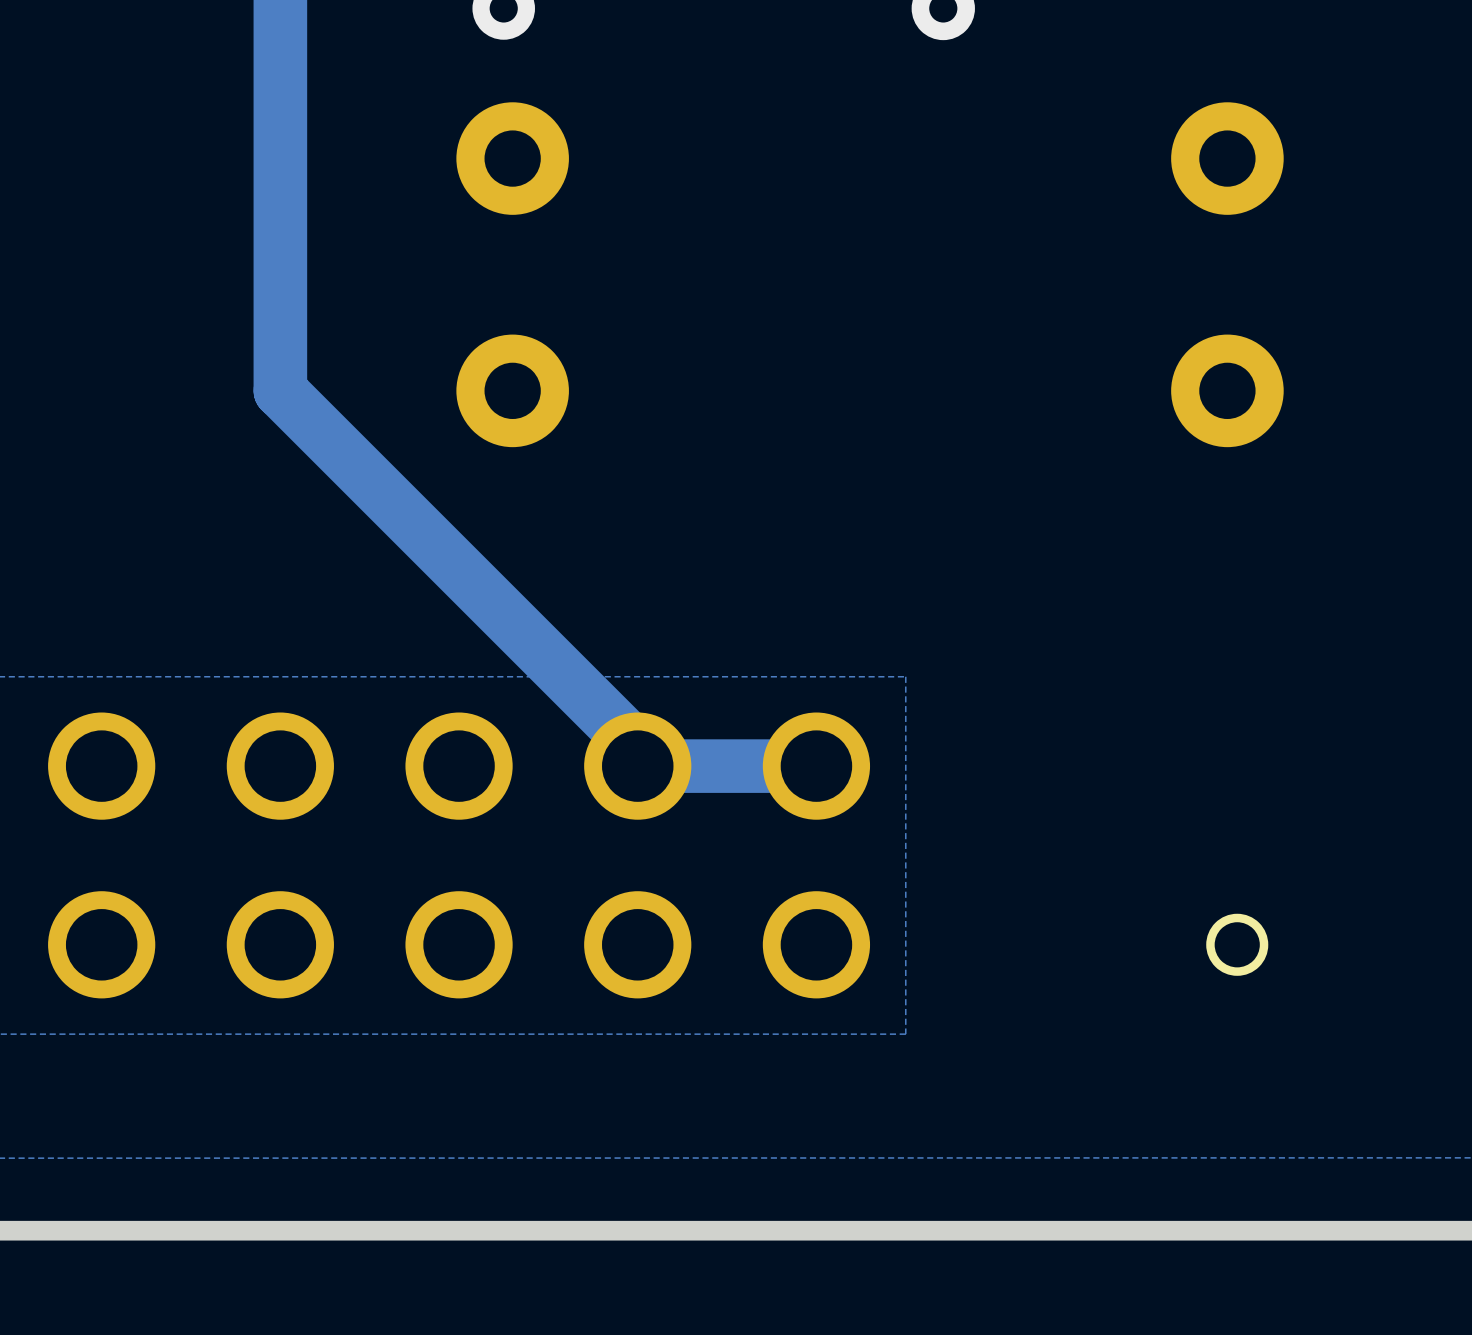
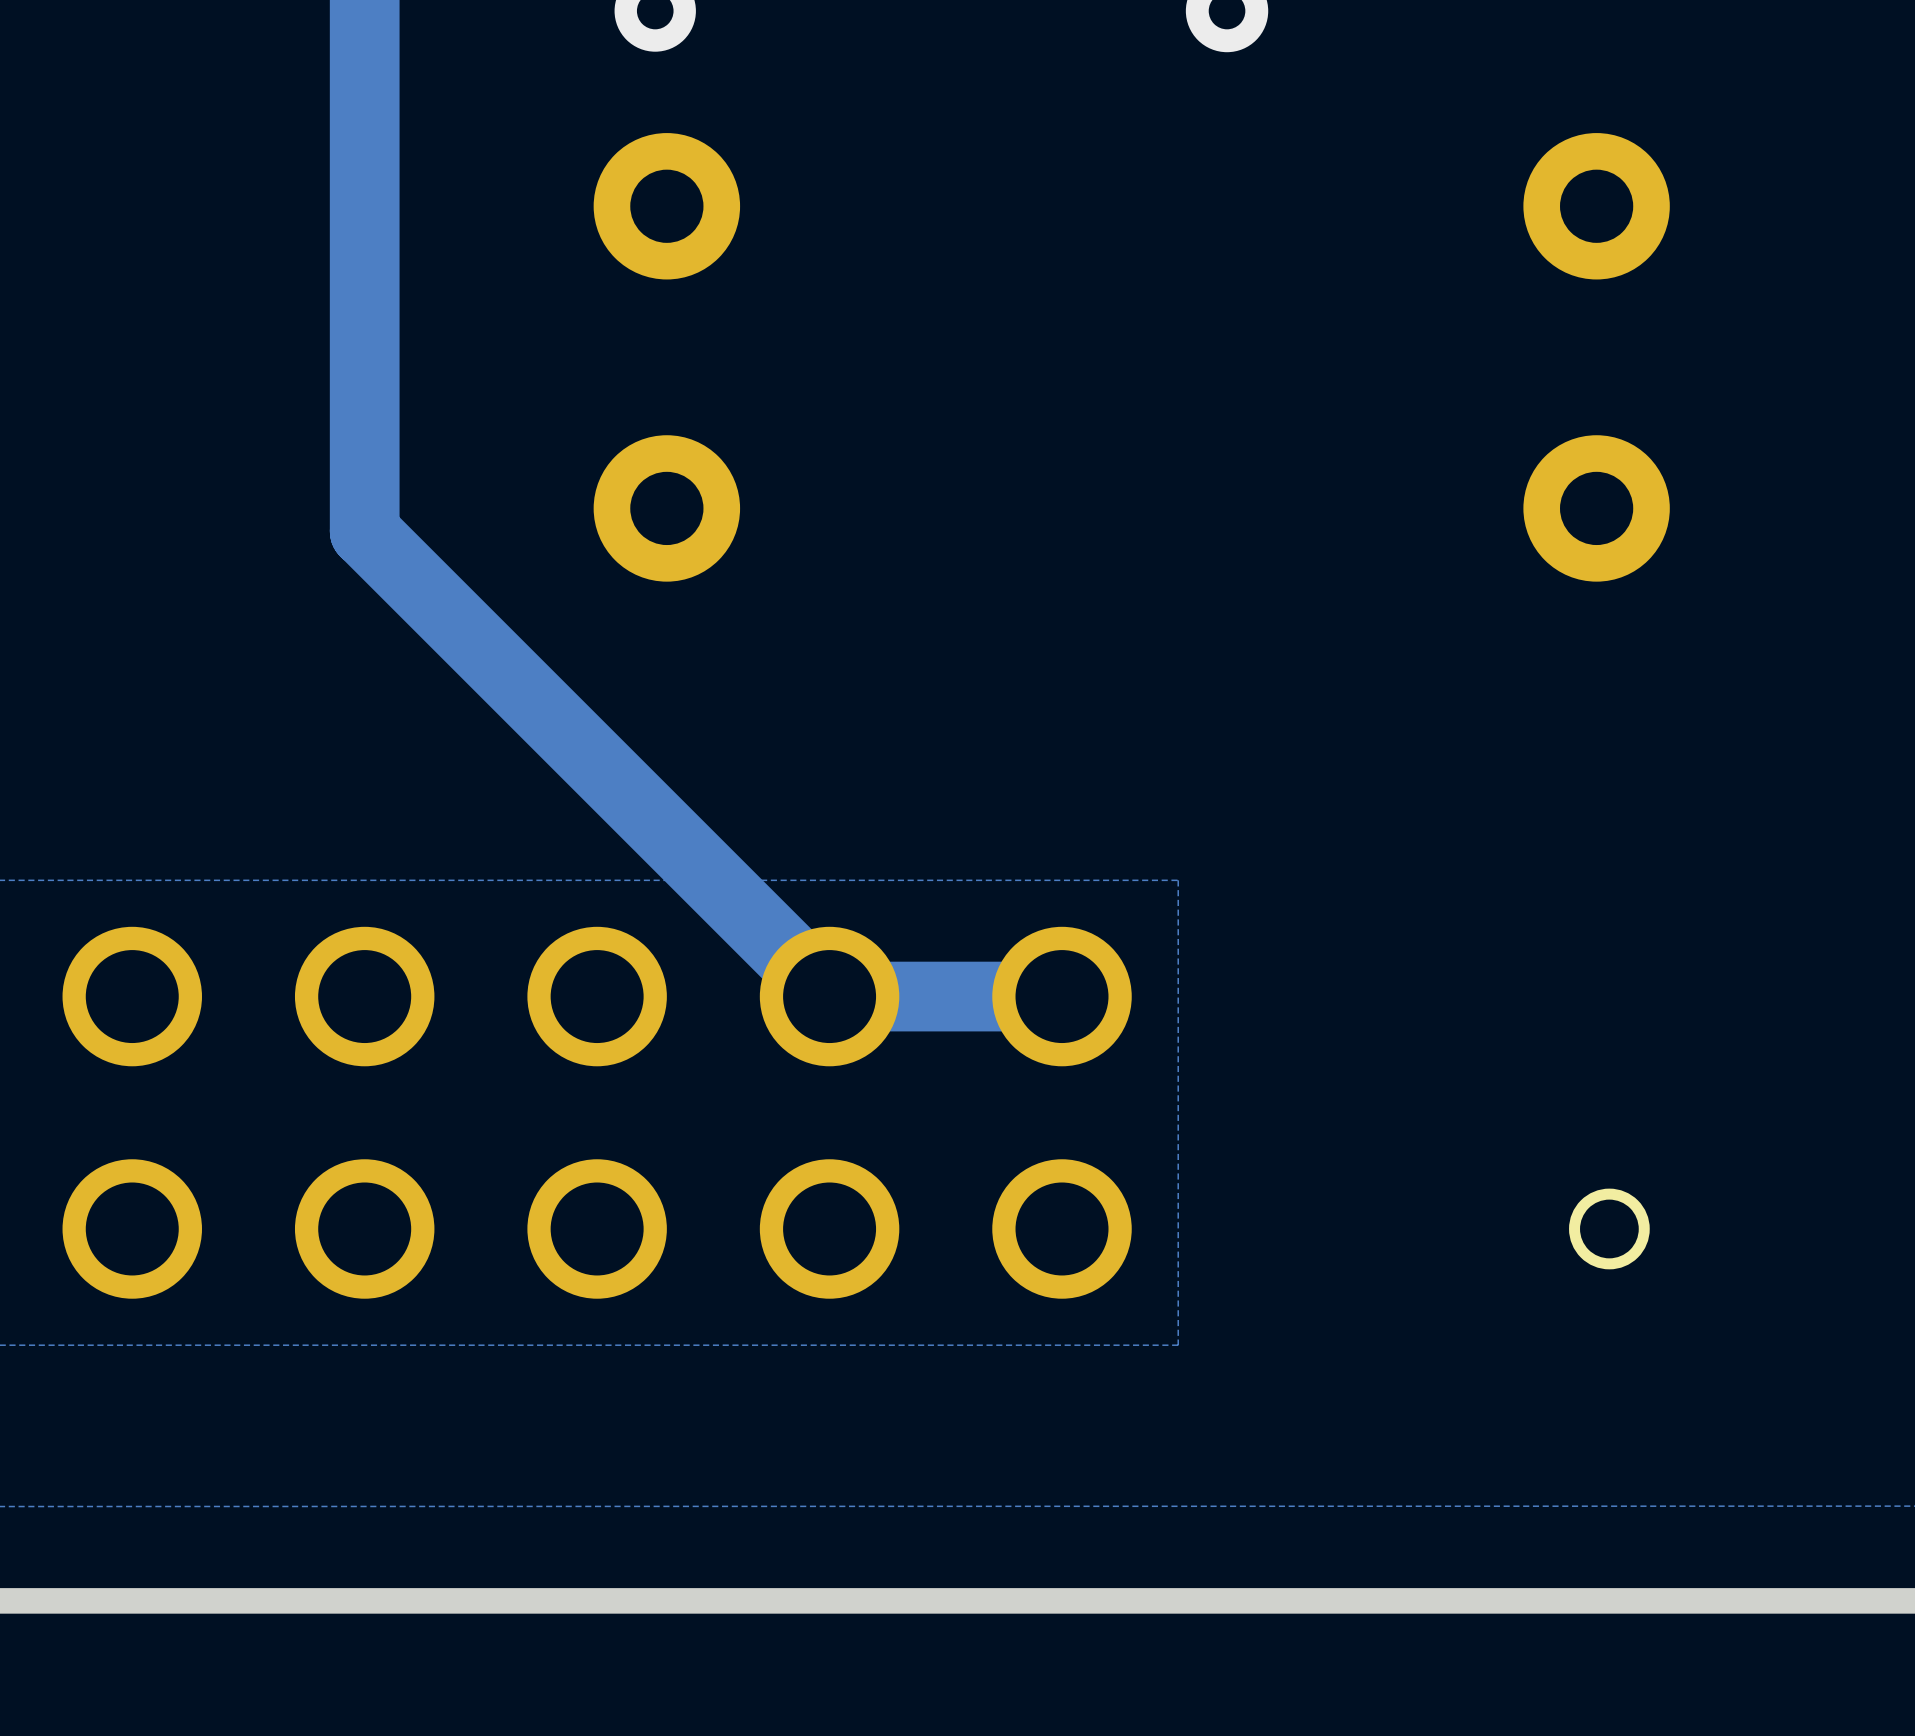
track: (280, 390) (637, 748) (637, 766) -> (364, 508) (364, 531) (829, 996)

